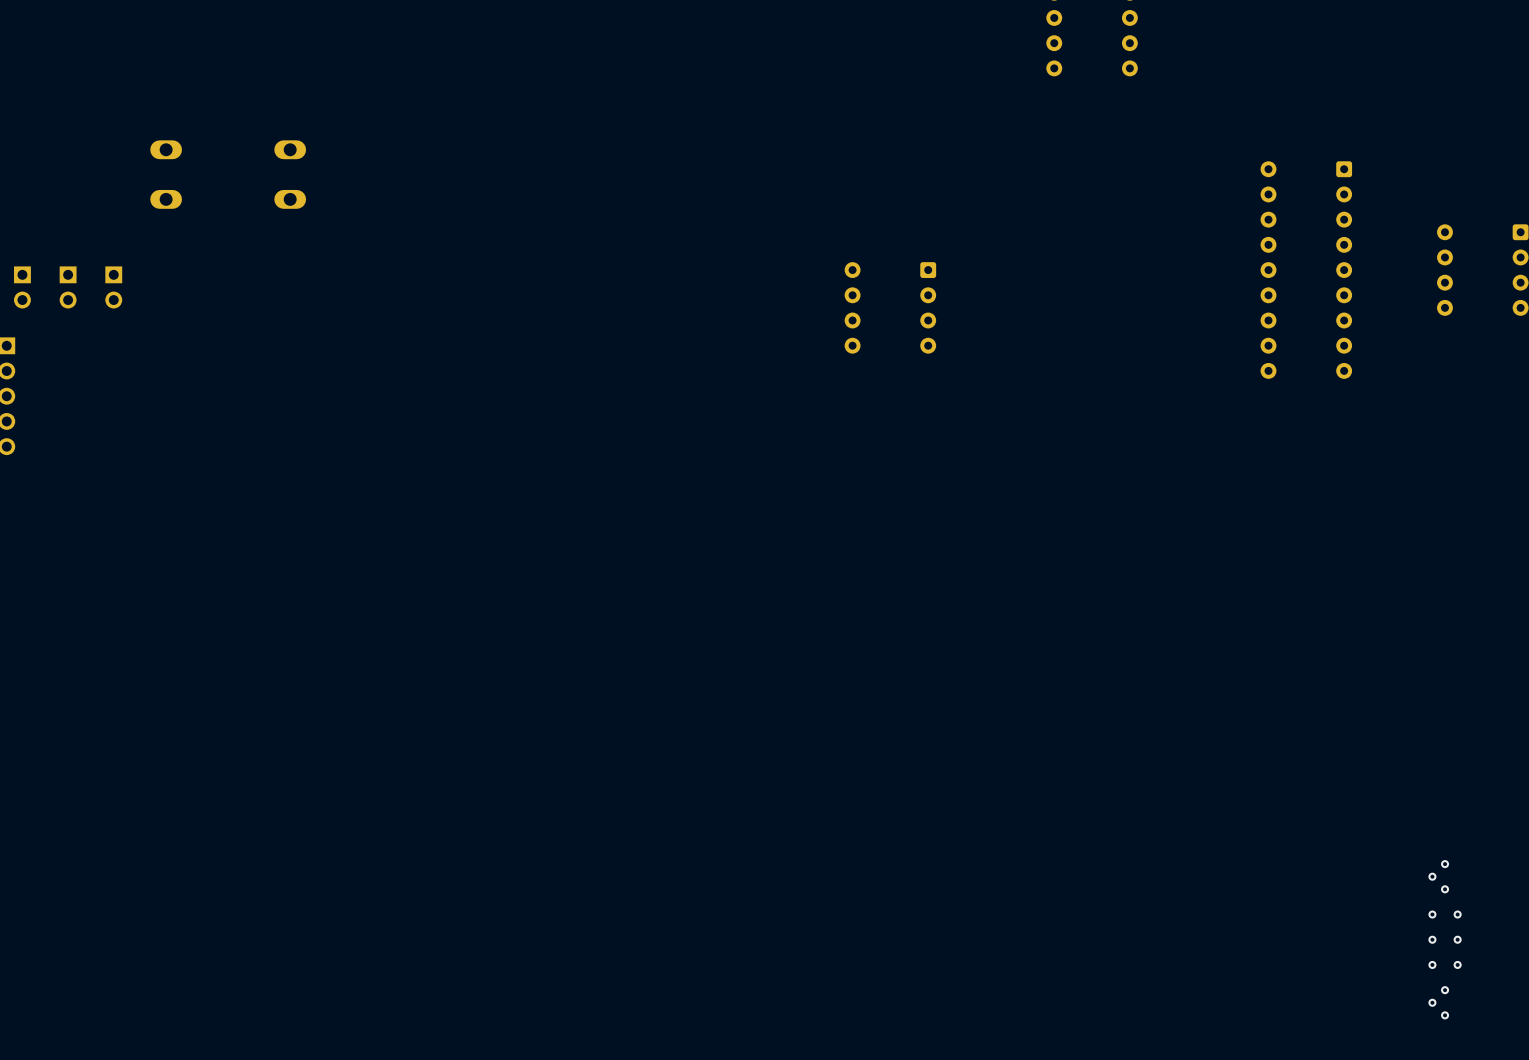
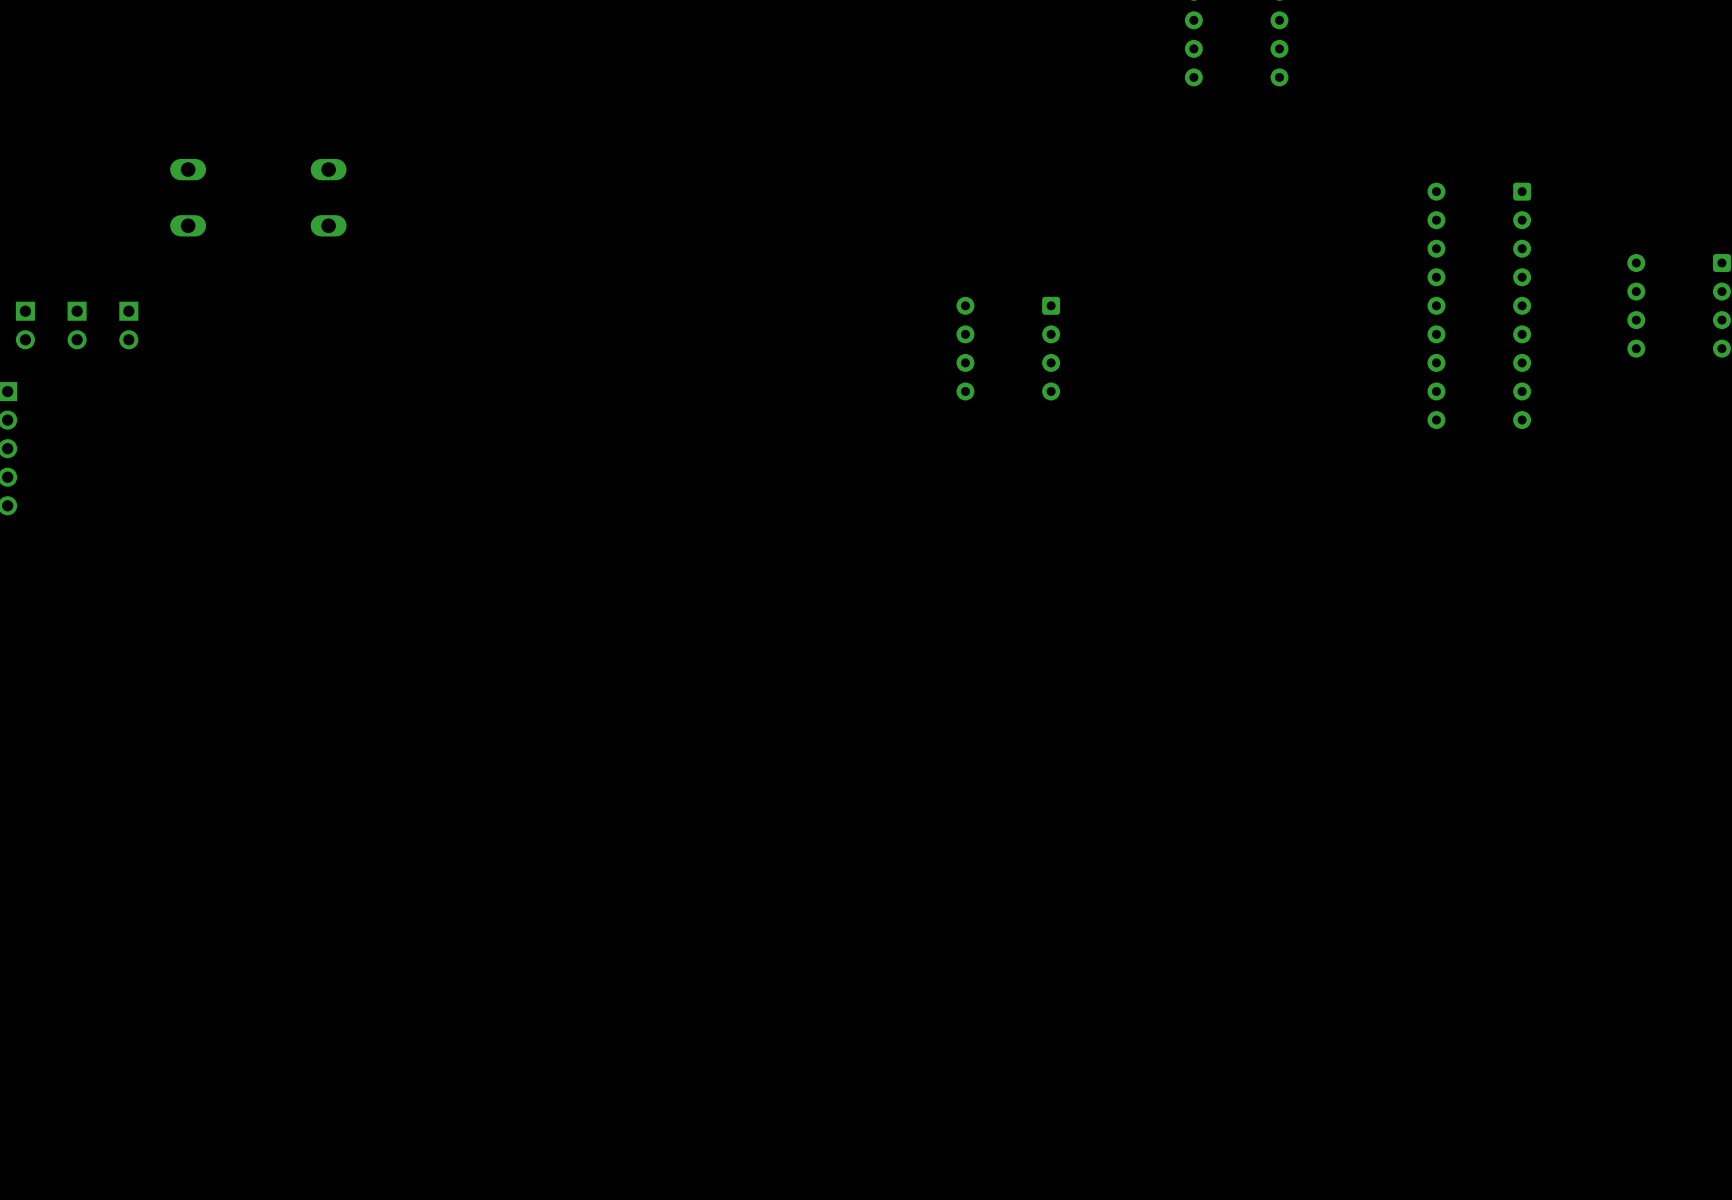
via: (1445, 864) -> none
via: (1432, 876) -> none
via: (1445, 889) -> none
via: (1432, 914) -> none
via: (1457, 914) -> none
via: (1432, 939) -> none
via: (1457, 939) -> none
via: (1432, 964) -> none
via: (1457, 964) -> none
via: (1445, 990) -> none
via: (1432, 1002) -> none
via: (1445, 1015) -> none

